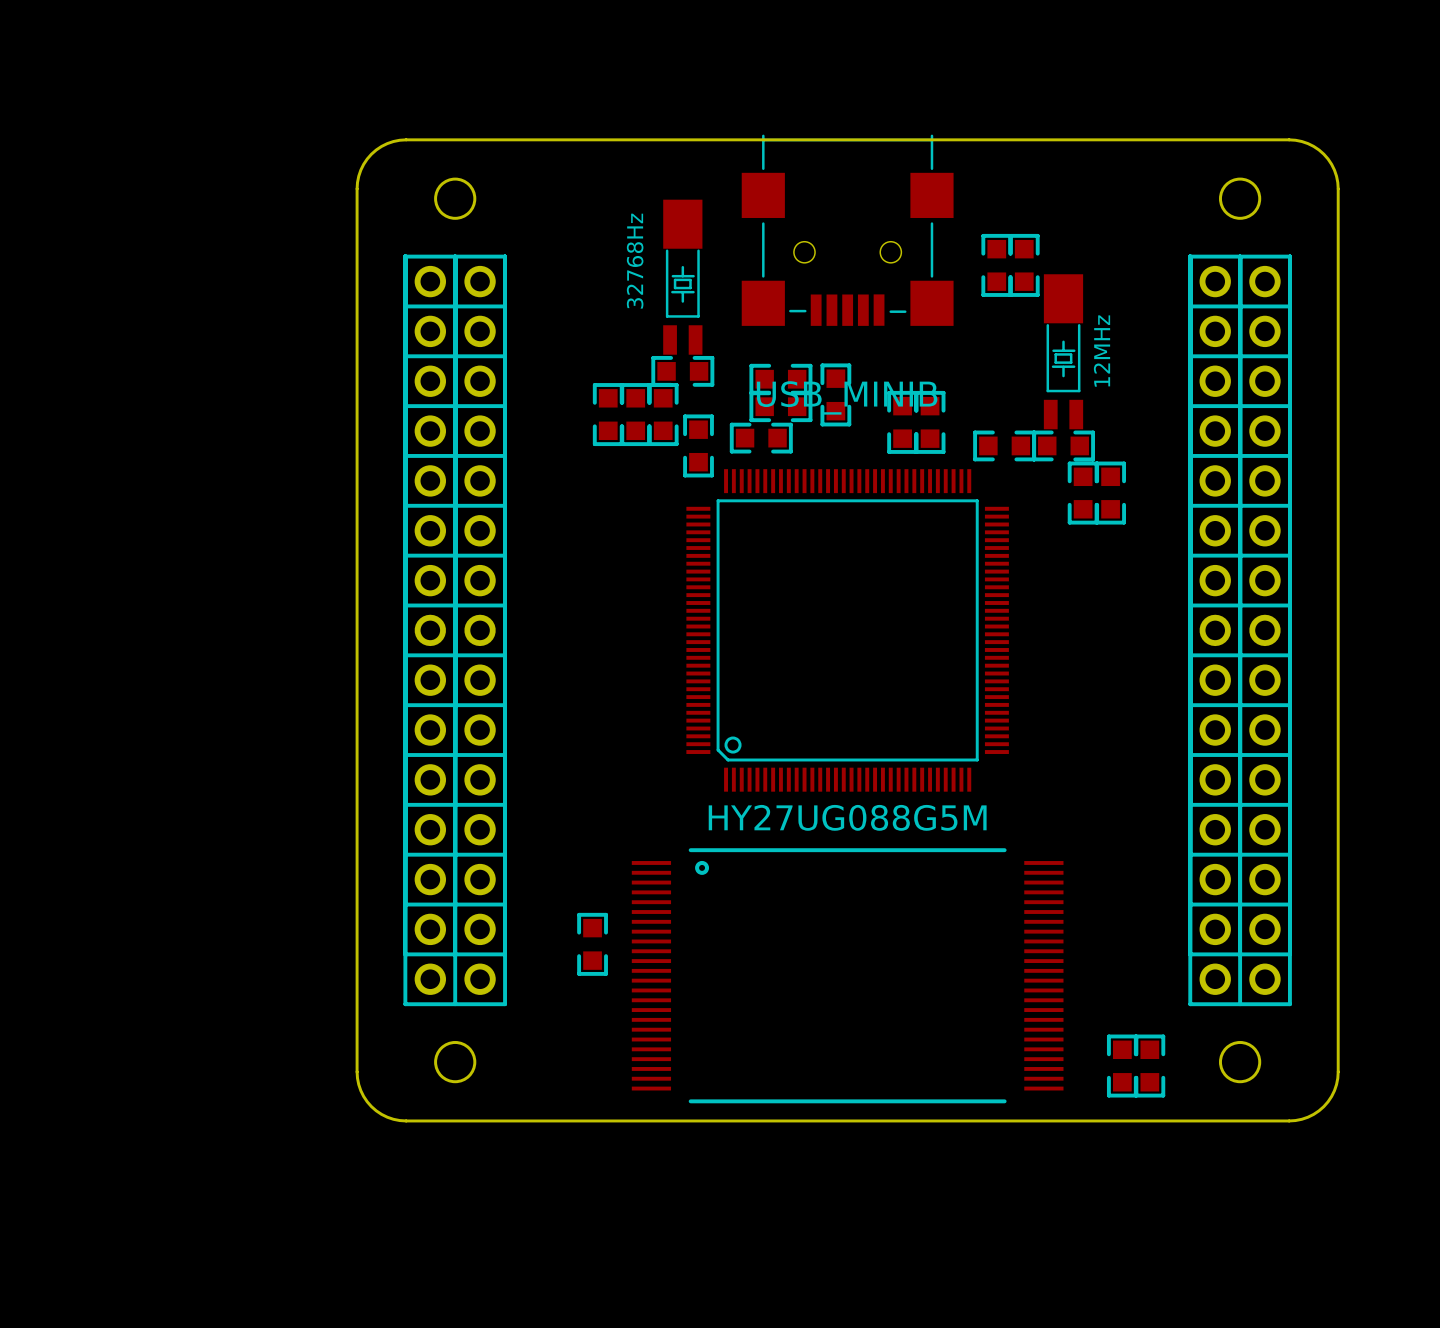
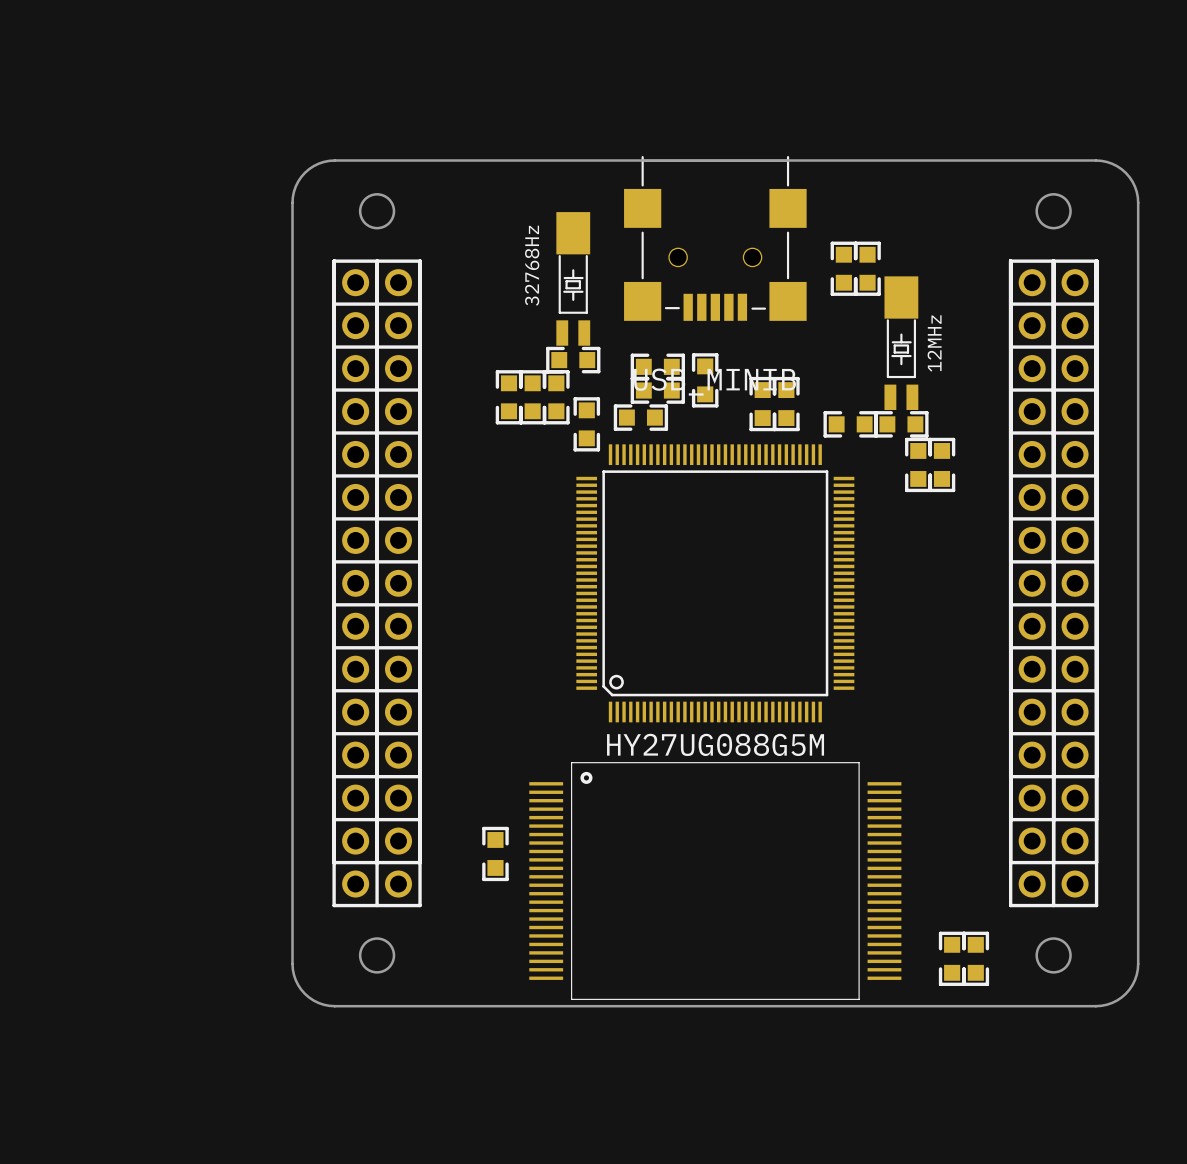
part footprint: [631, 838, 1064, 1104] -> [529, 762, 902, 1000]

